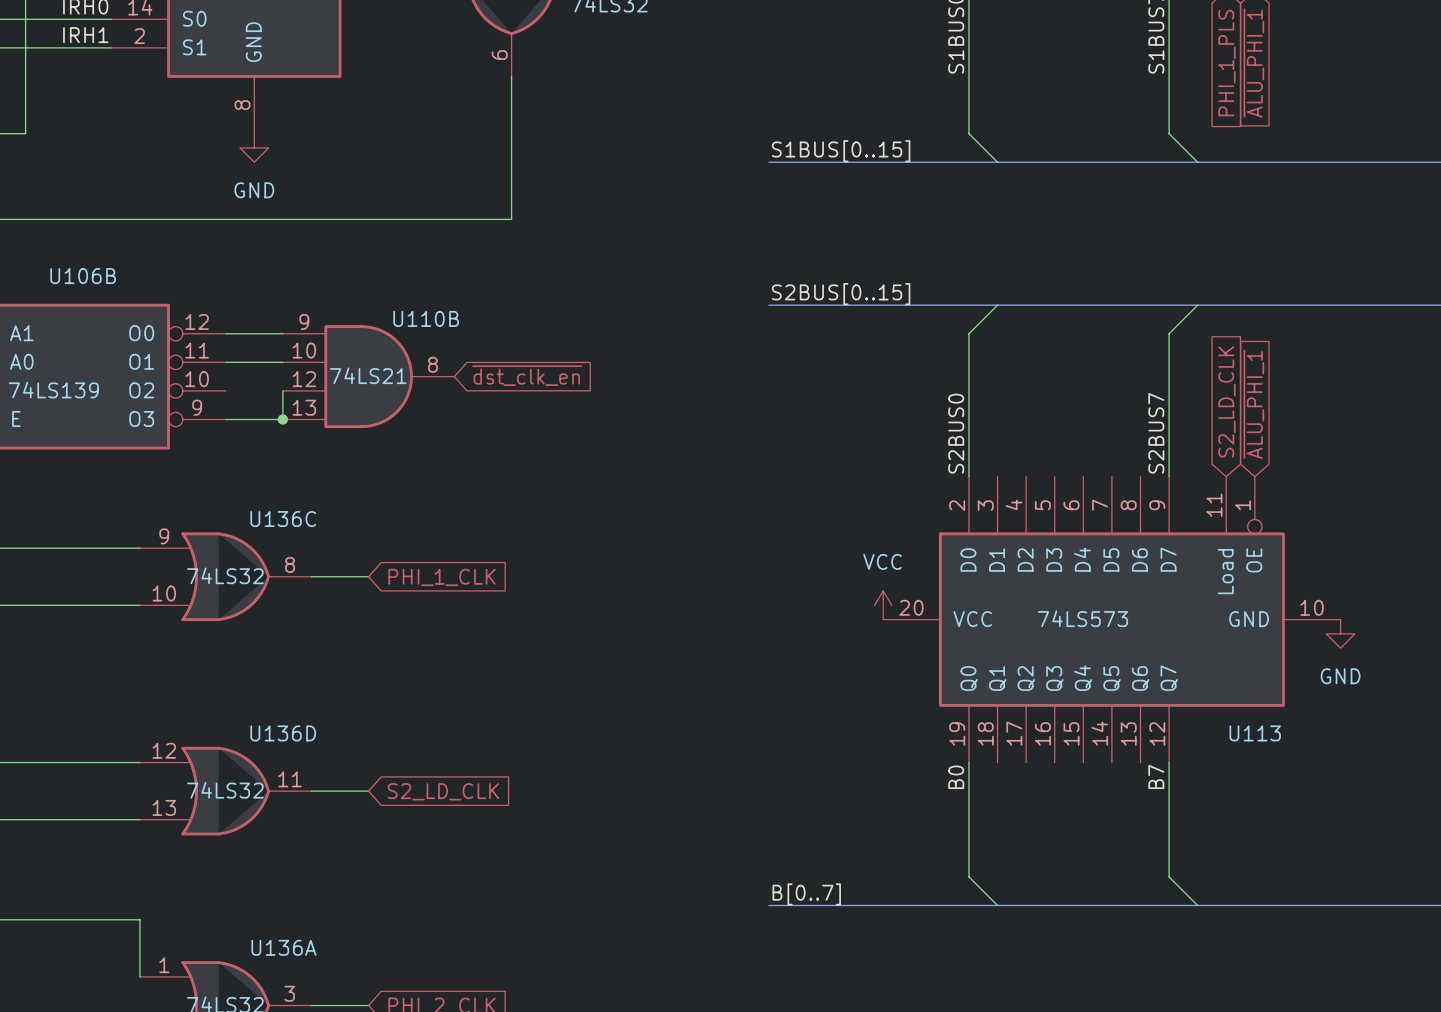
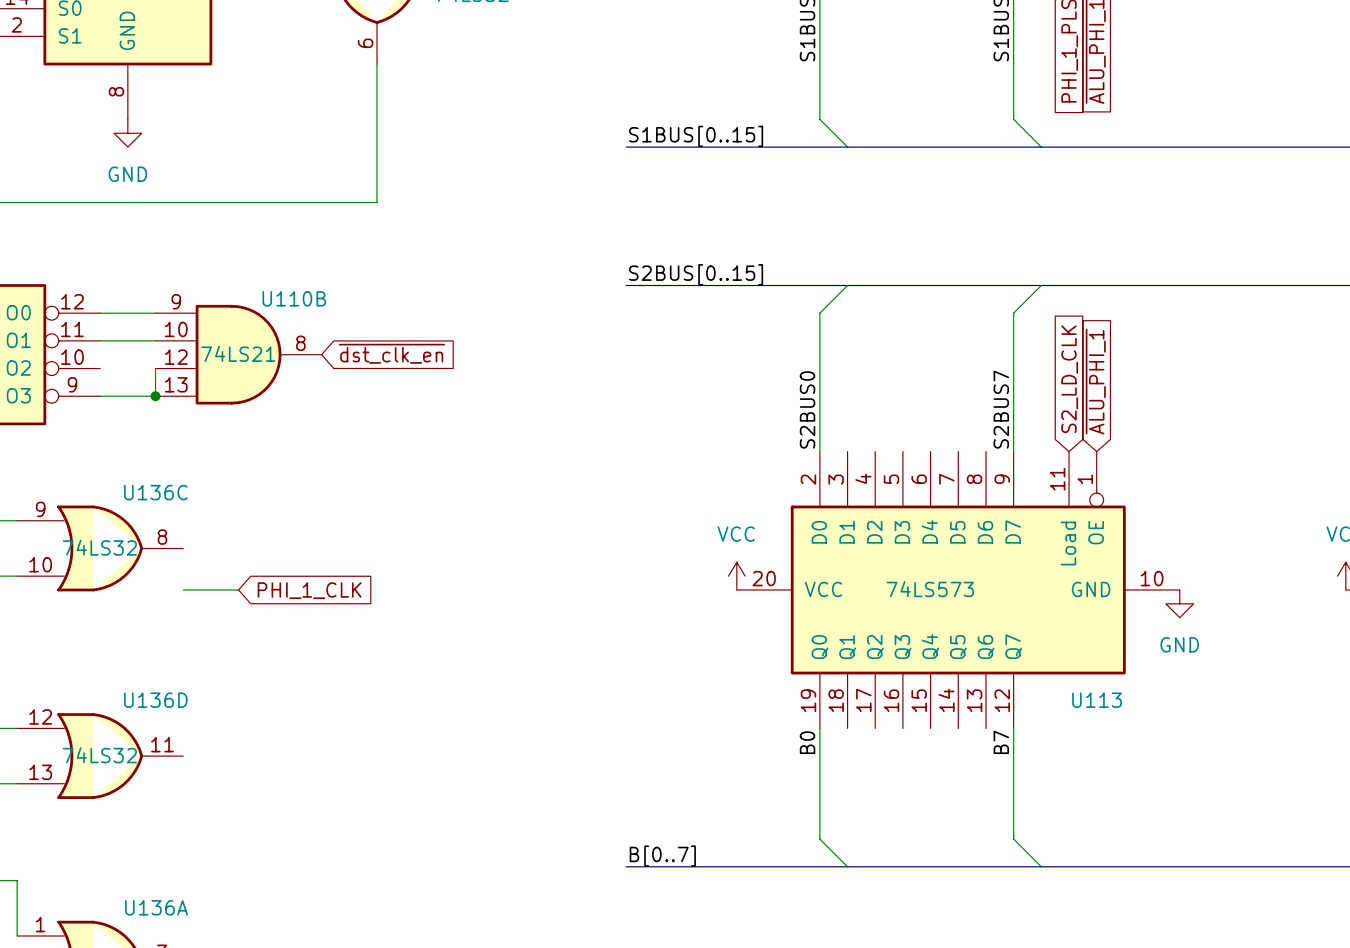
wire: (311, 576) (368, 576) -> (183, 589) (238, 589)
global label position: PHI_1_CLK (442, 577) -> PHI_1_CLK (309, 590)
wire: (311, 791) (368, 791) -> none
global label: S2_LD_CLK (443, 791) -> none

